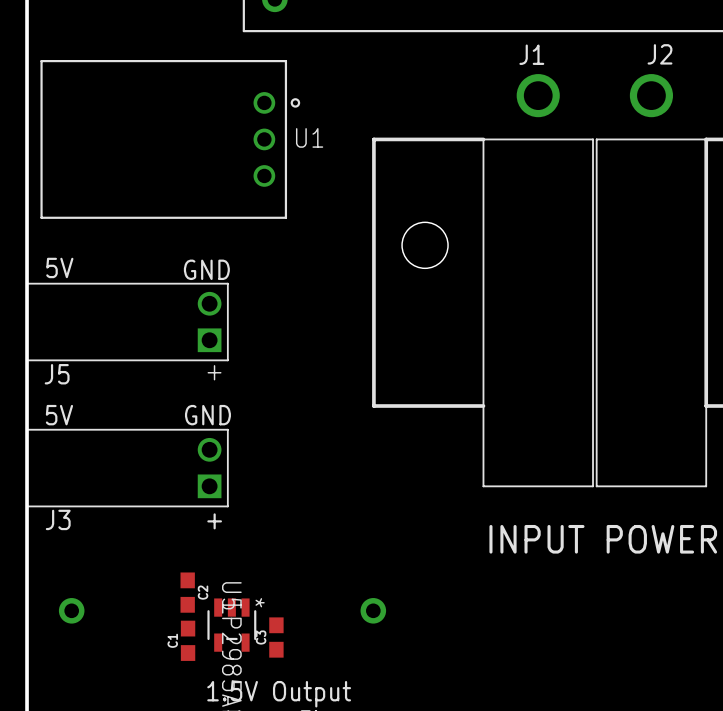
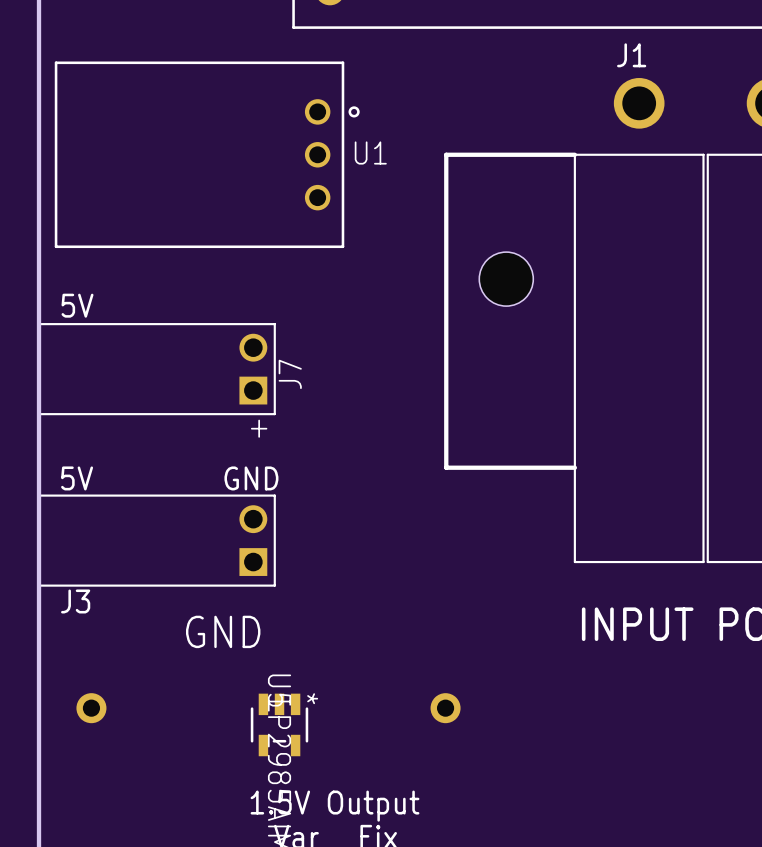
text: GND (206, 269) -> none
J5 name: J5 (57, 374) -> J7 (290, 374)
text: + (214, 521) -> none
text: none -> GND (223, 631)
C2: (187, 592) -> none
C3: (276, 637) -> none
C1: (188, 640) -> none

